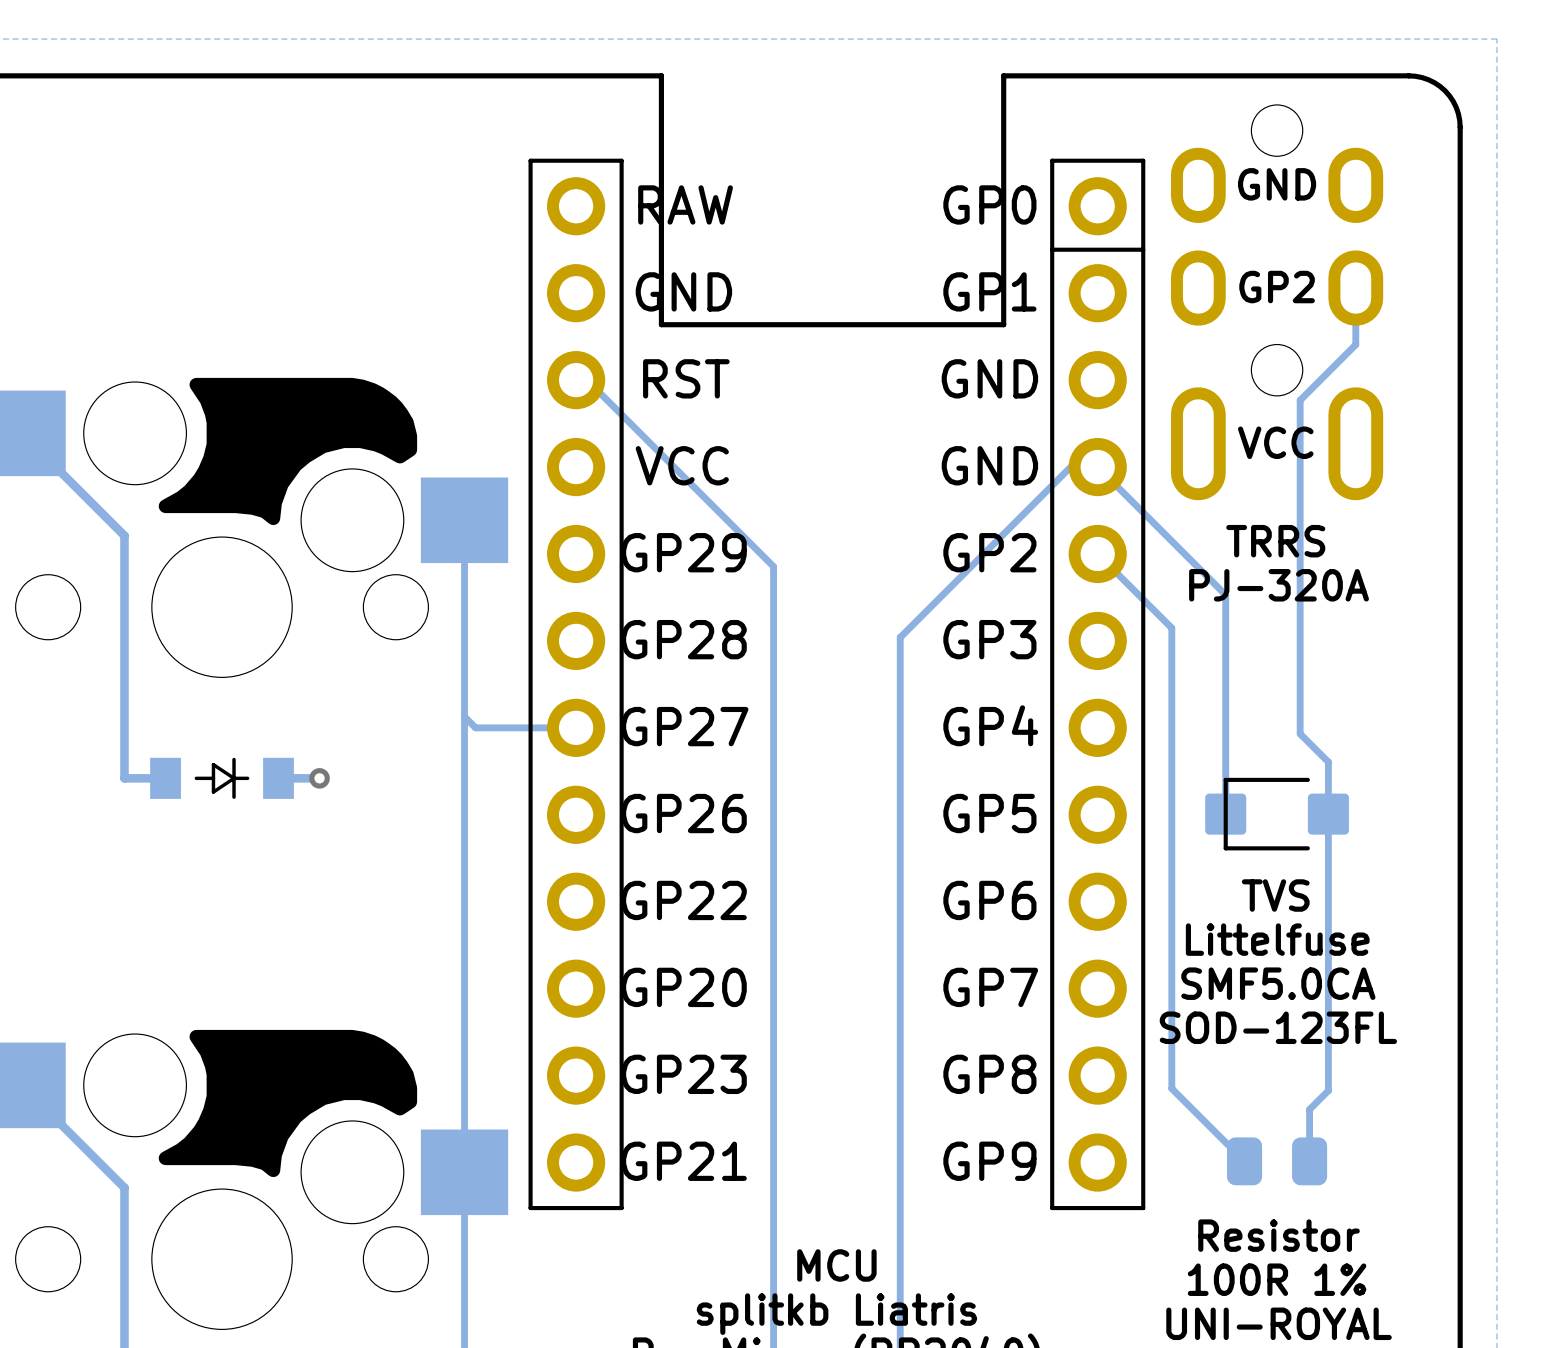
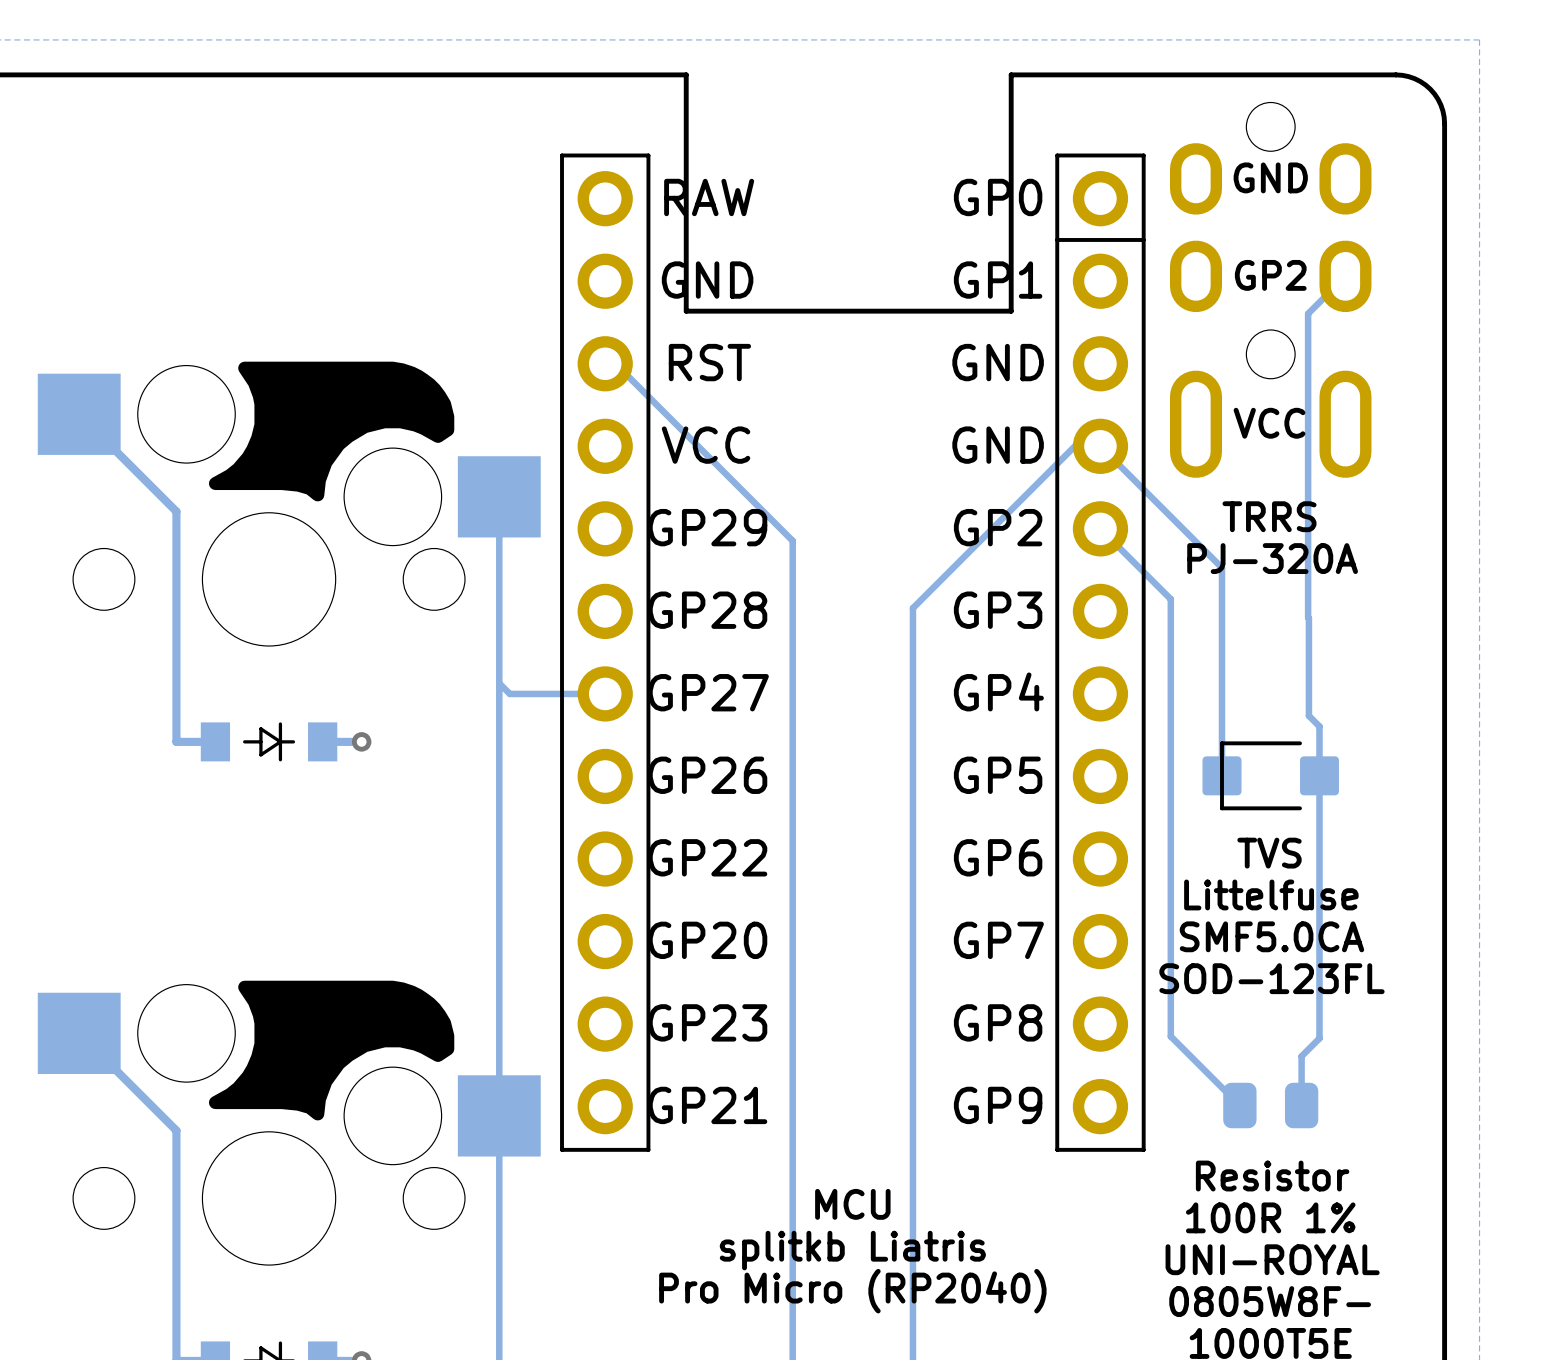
track: (1355, 288) (1355, 344) (1300, 400) (1300, 733) (1317, 750) -> (1345, 276) (1308, 313) (1308, 715)

